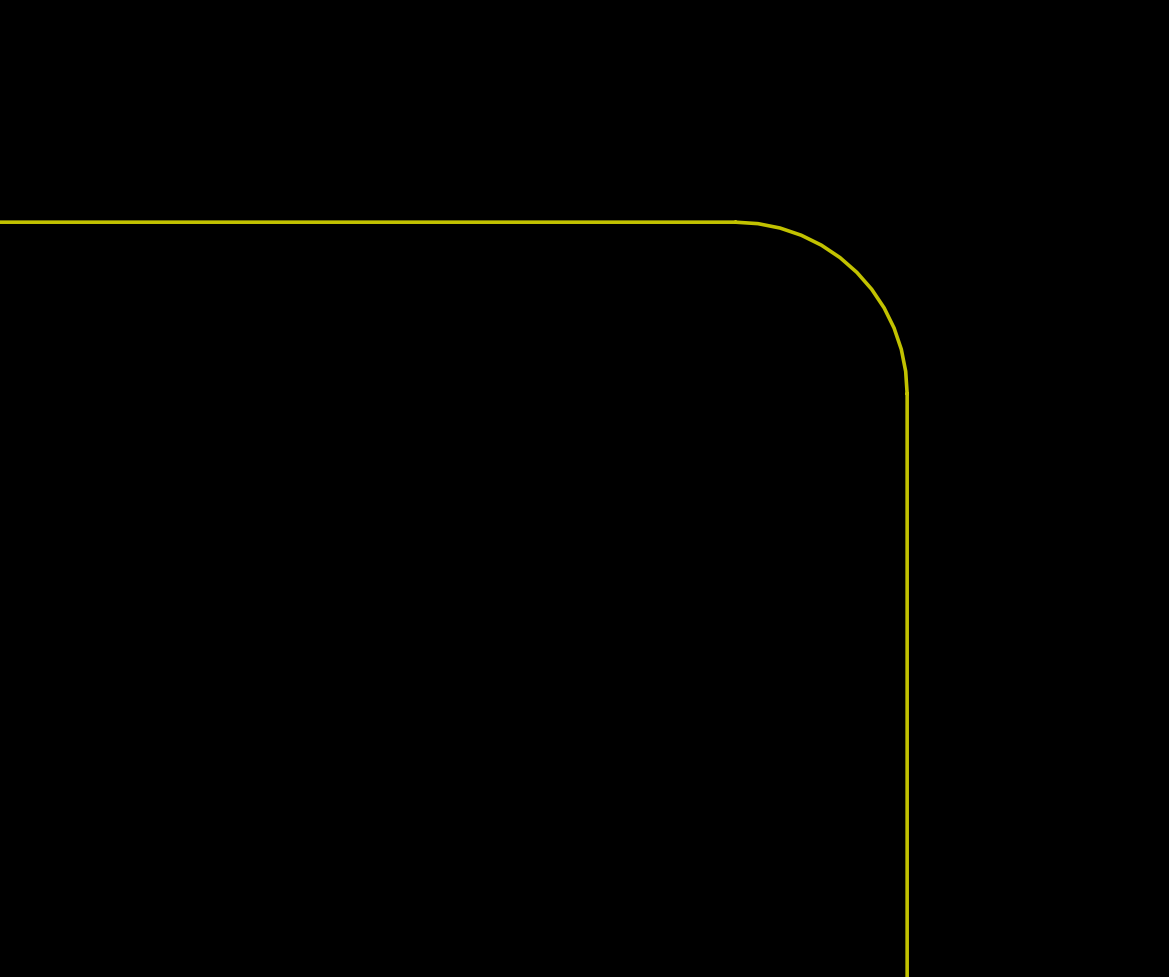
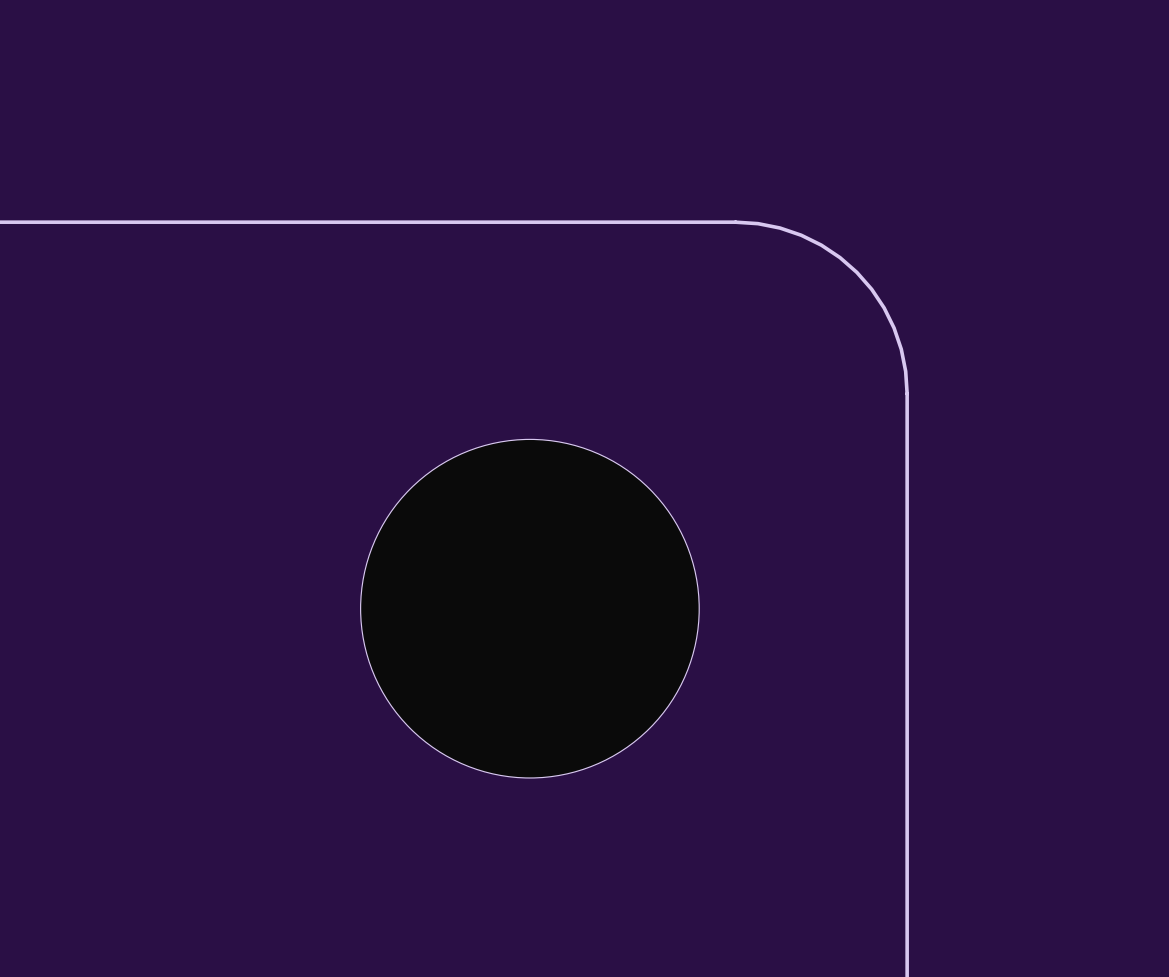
part: none -> (529, 608)

